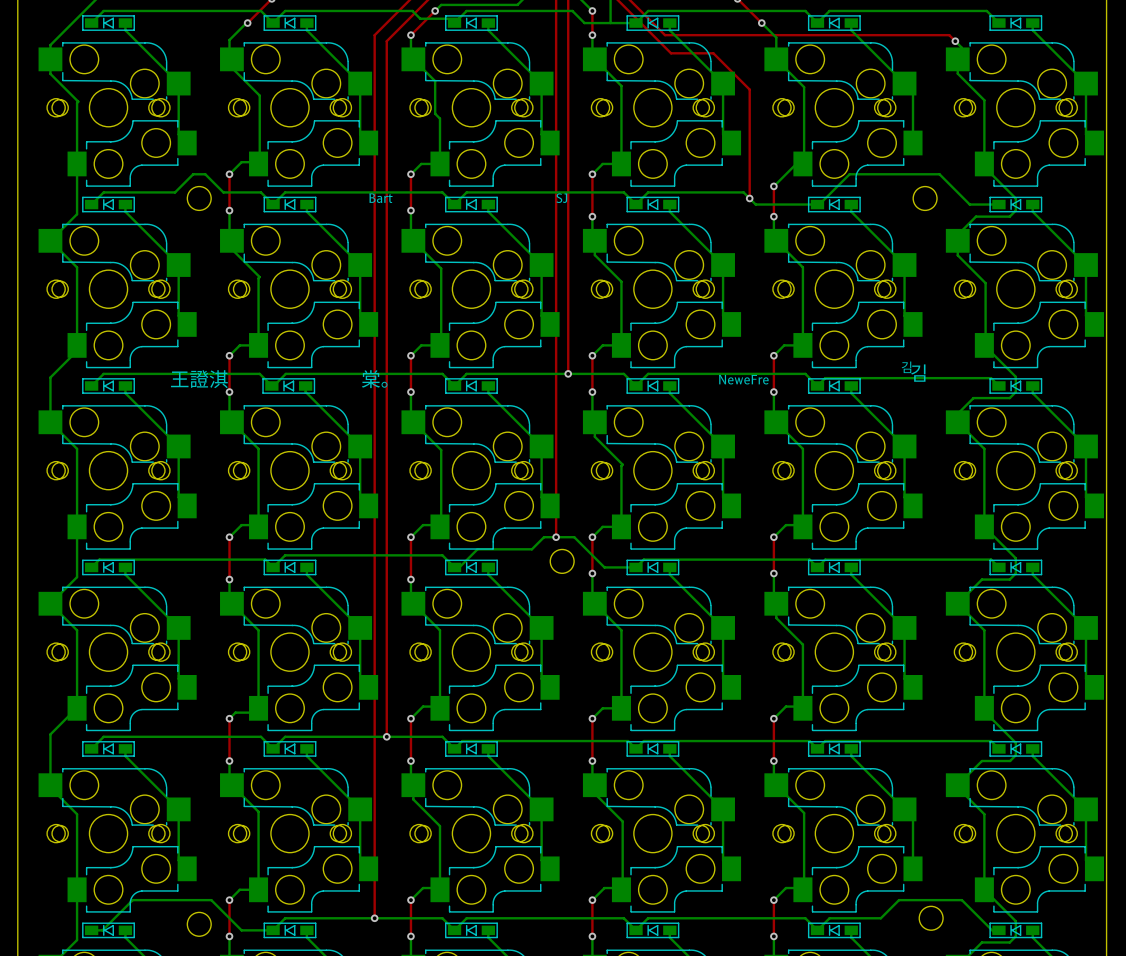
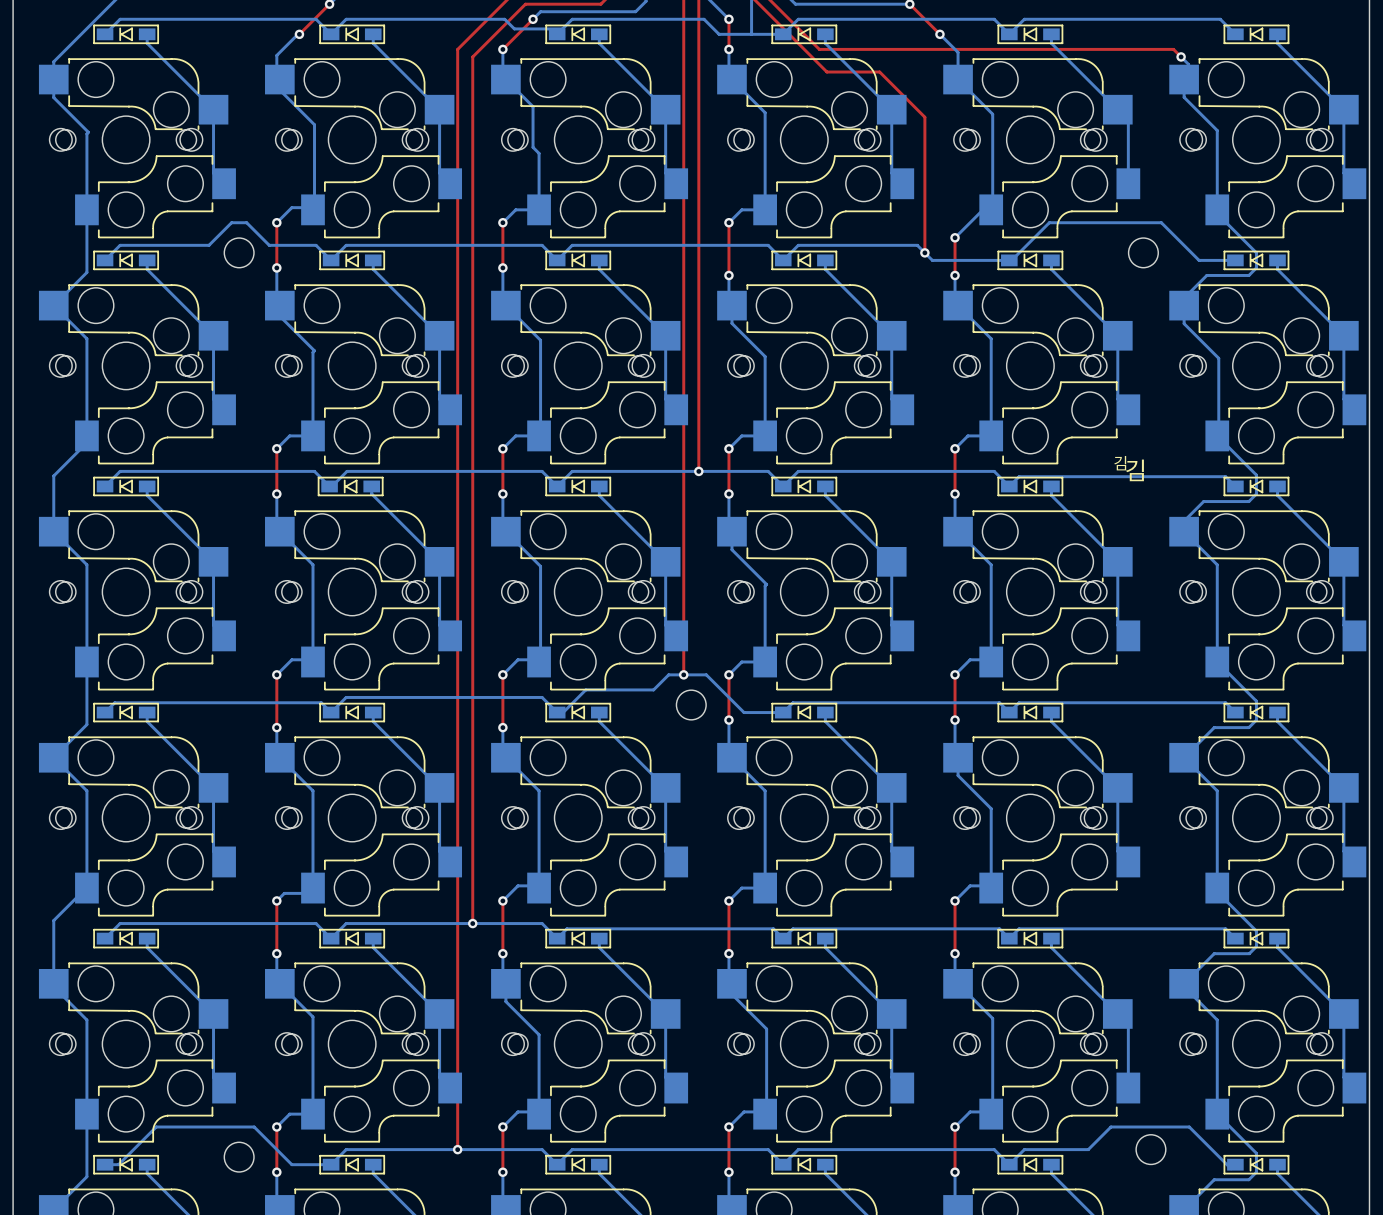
text: Bart (380, 198) -> none
text: SJ (561, 198) -> none
text: 王證淇 (199, 379) -> none
text: 棠。 (374, 379) -> none
text: NeweFre (743, 379) -> none

